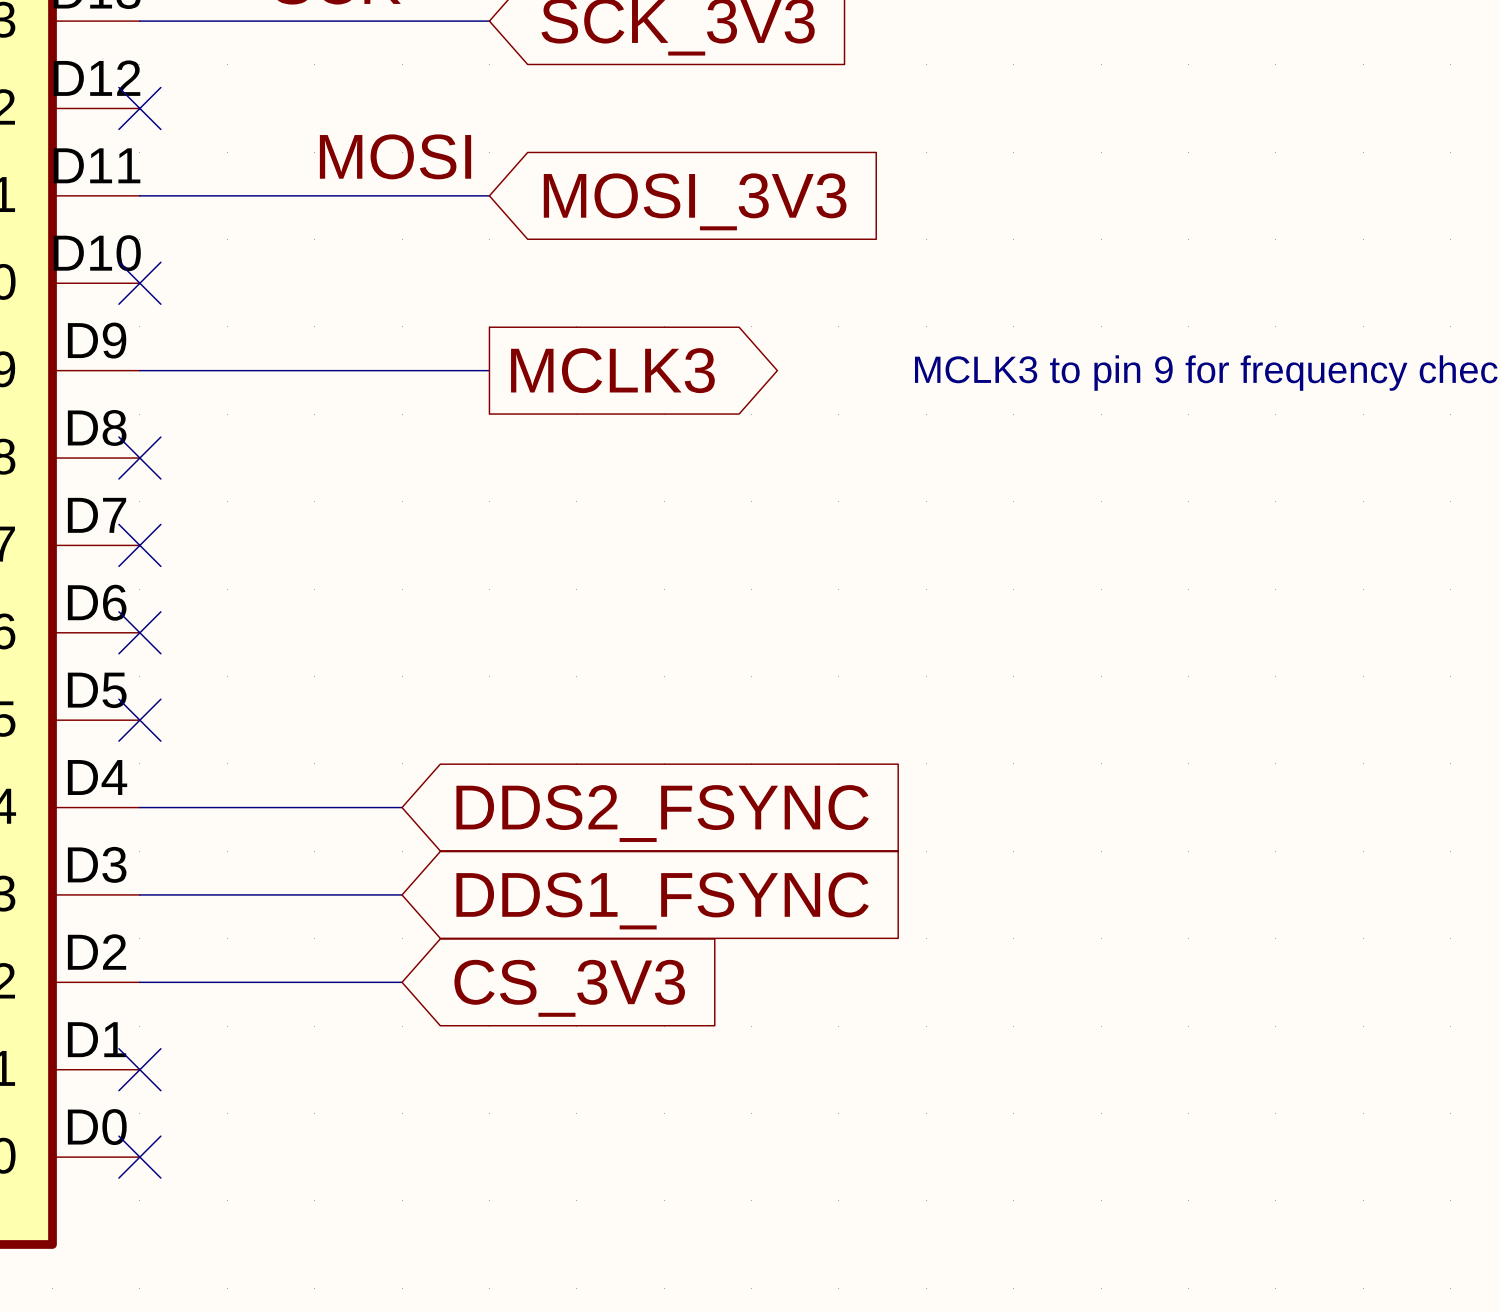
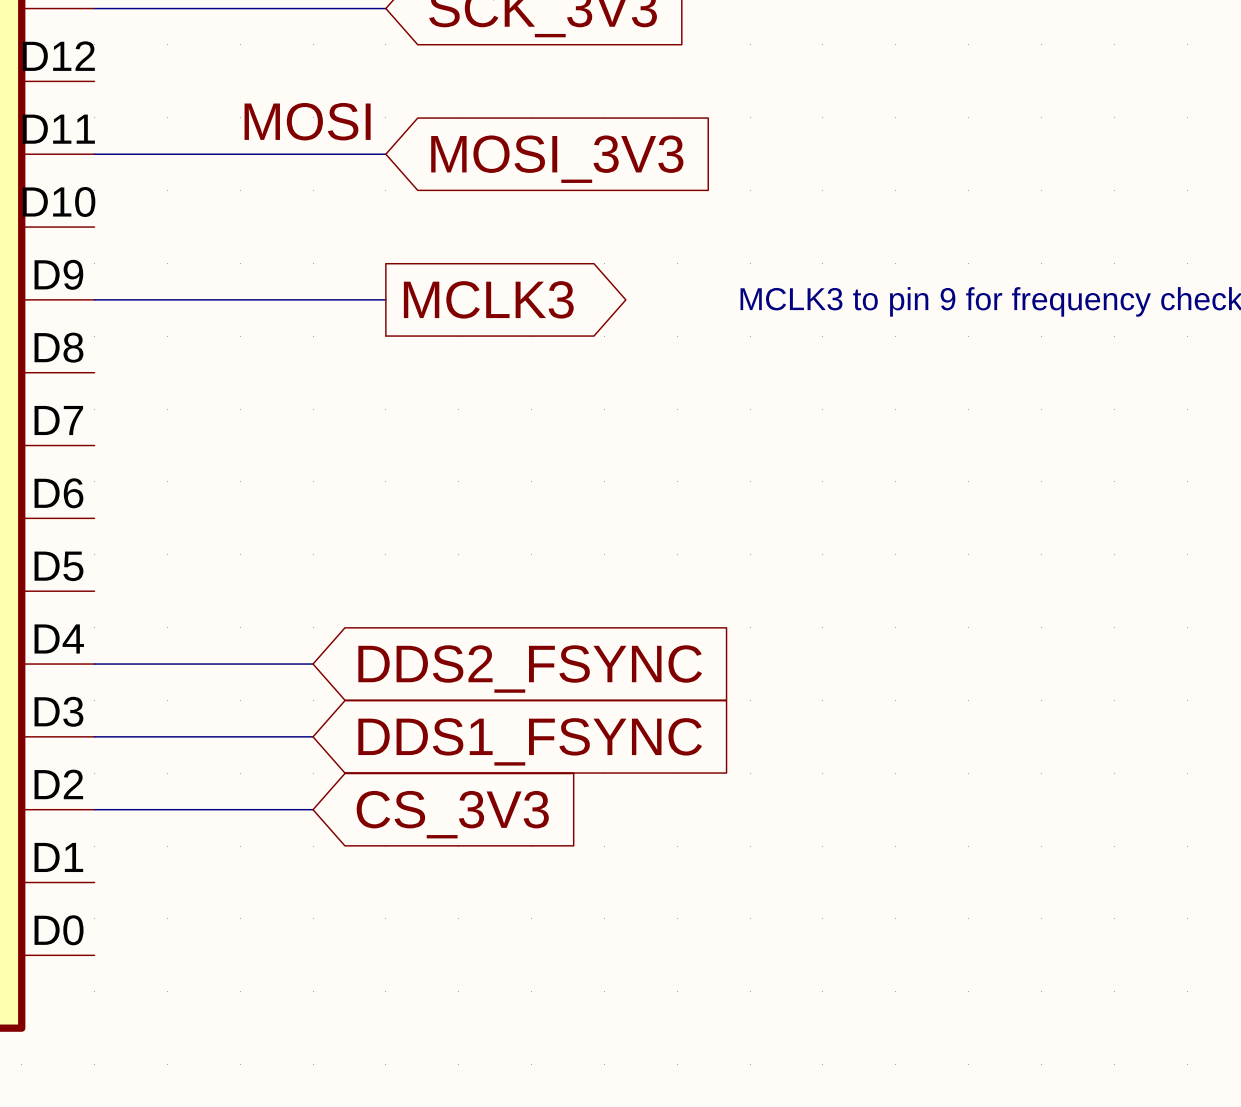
no-connect mark: (139, 108) -> none
no-connect mark: (139, 283) -> none
no-connect mark: (139, 458) -> none
no-connect mark: (139, 545) -> none
no-connect mark: (139, 632) -> none
no-connect mark: (139, 720) -> none
no-connect mark: (139, 1069) -> none
no-connect mark: (139, 1157) -> none

